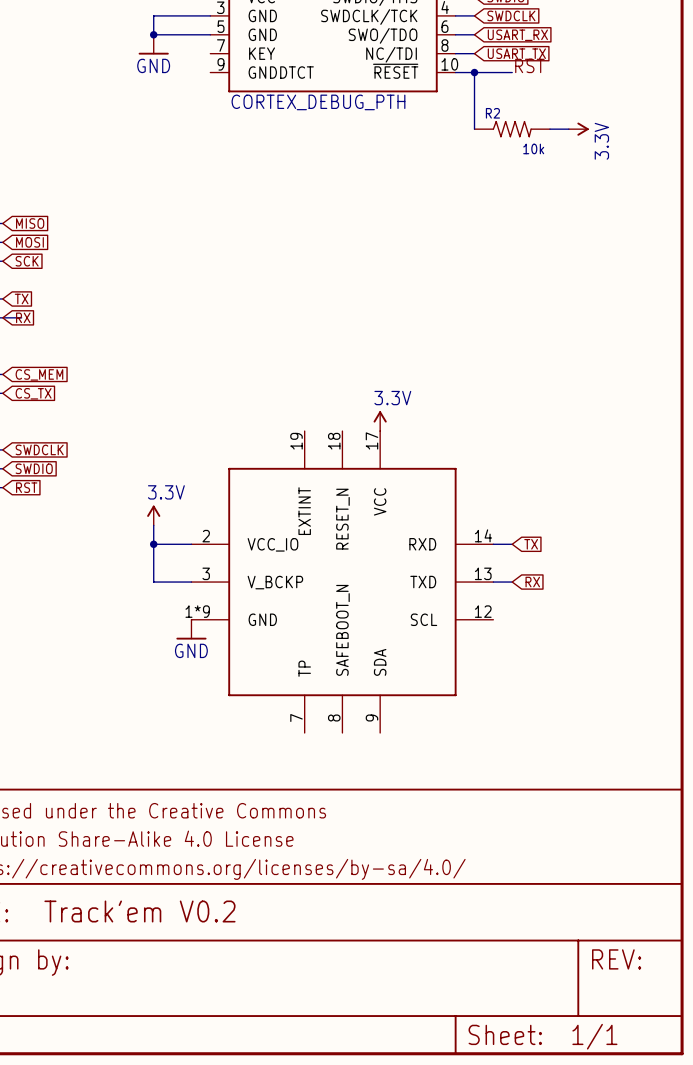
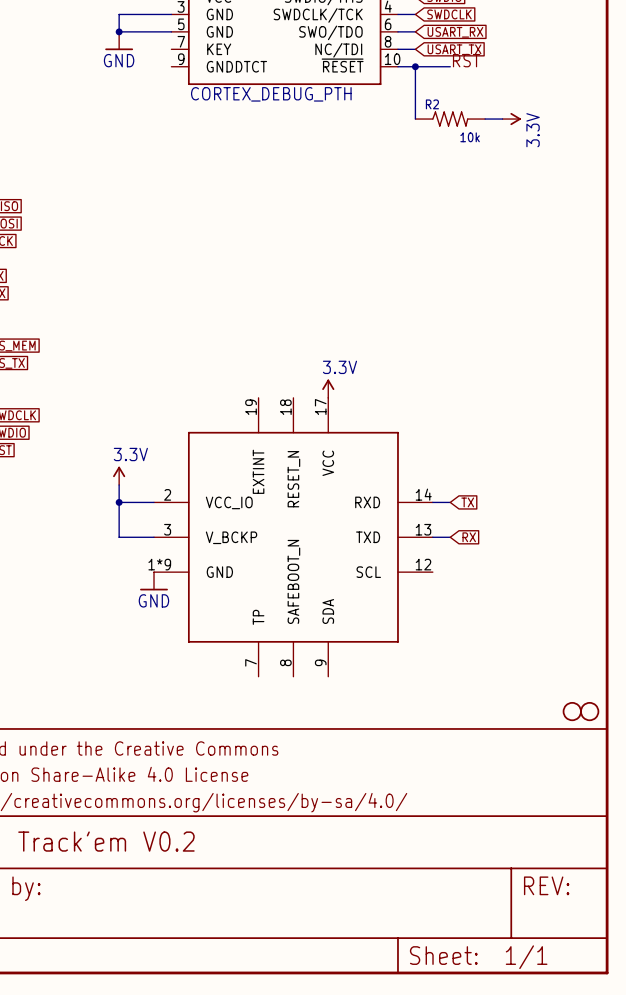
part: none -> (572, 711)
part: none -> (589, 711)

